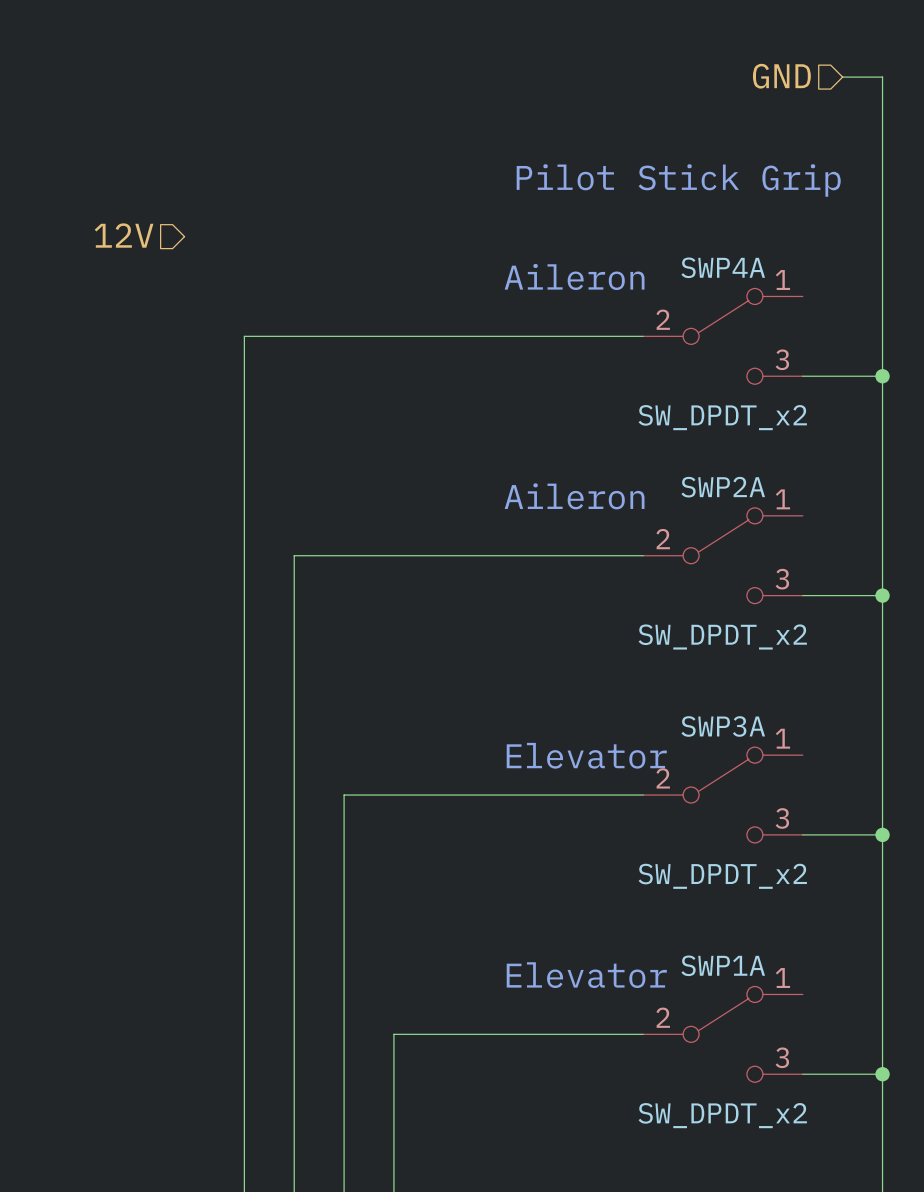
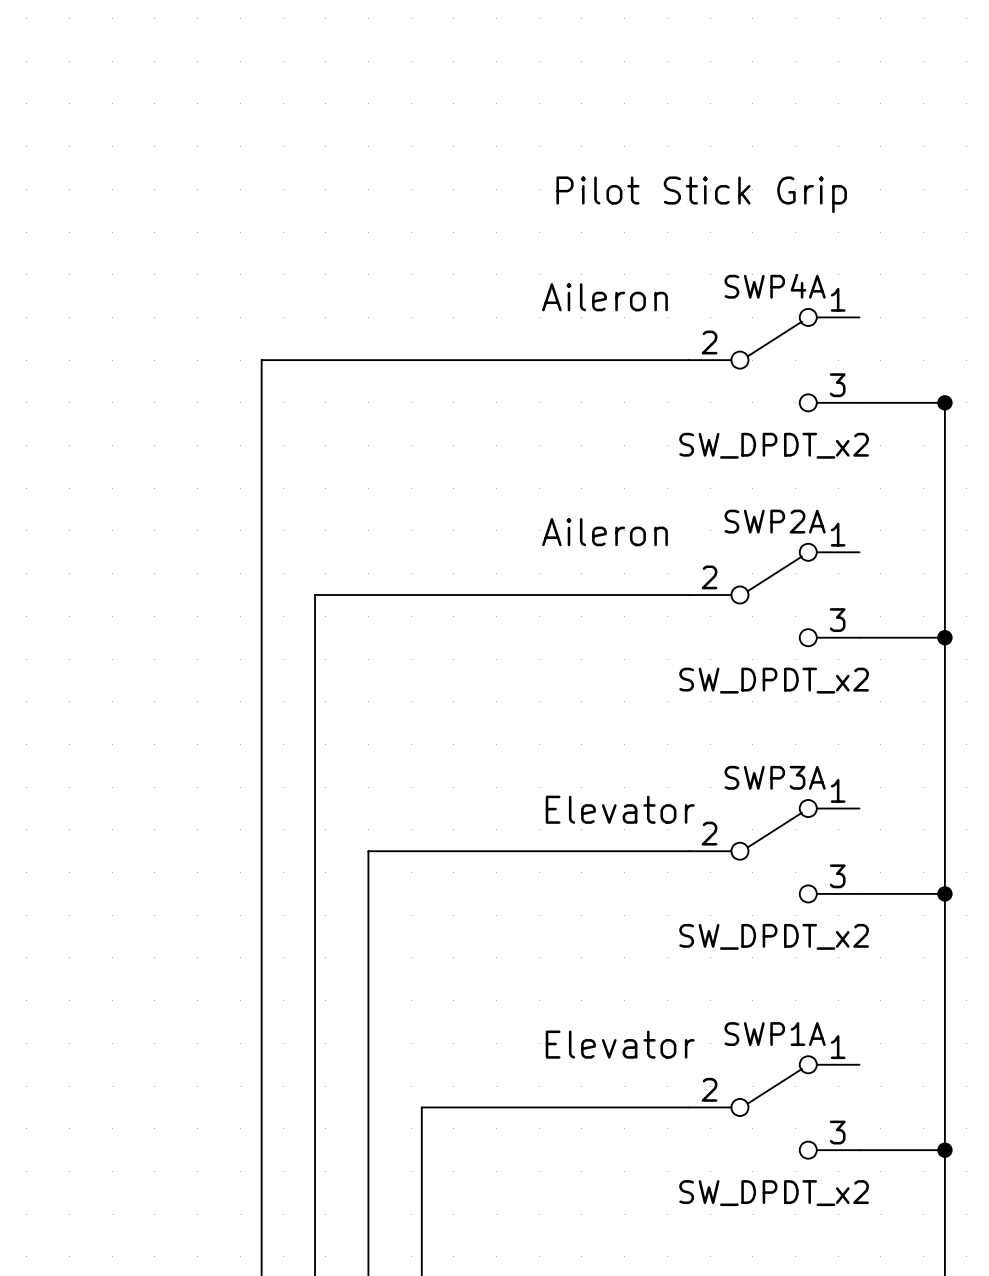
hierarchical label: GND (781, 76) -> none
wire: (842, 77) (882, 77) (882, 376) -> none
hierarchical label: 12V (124, 235) -> none

